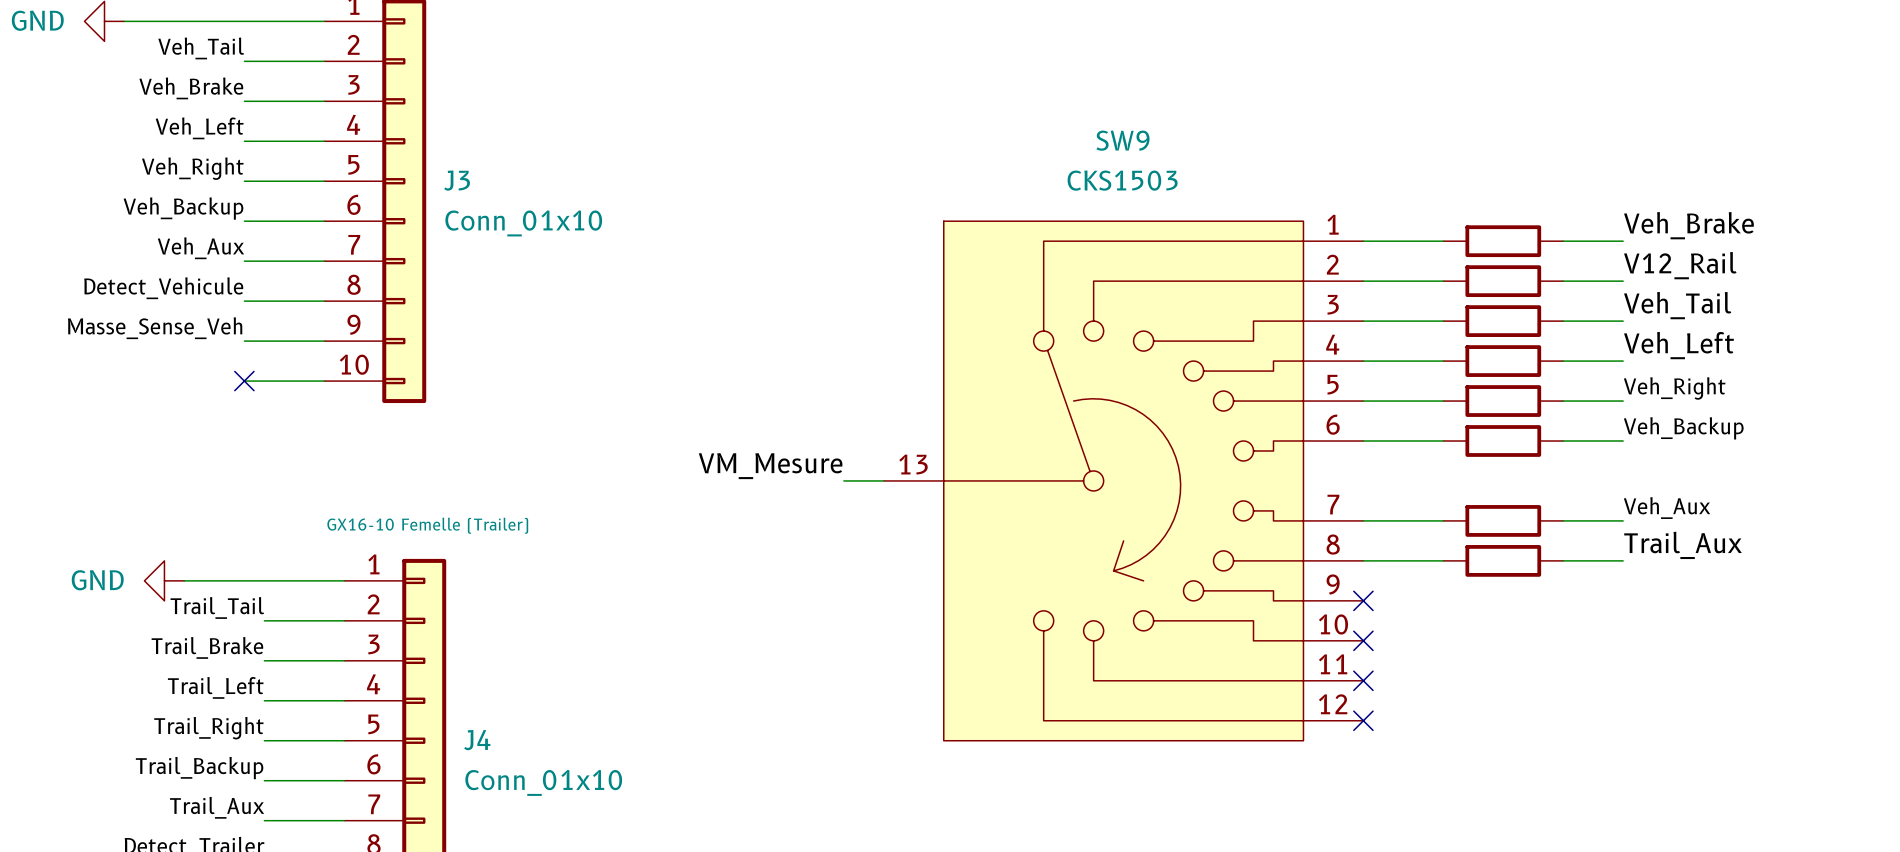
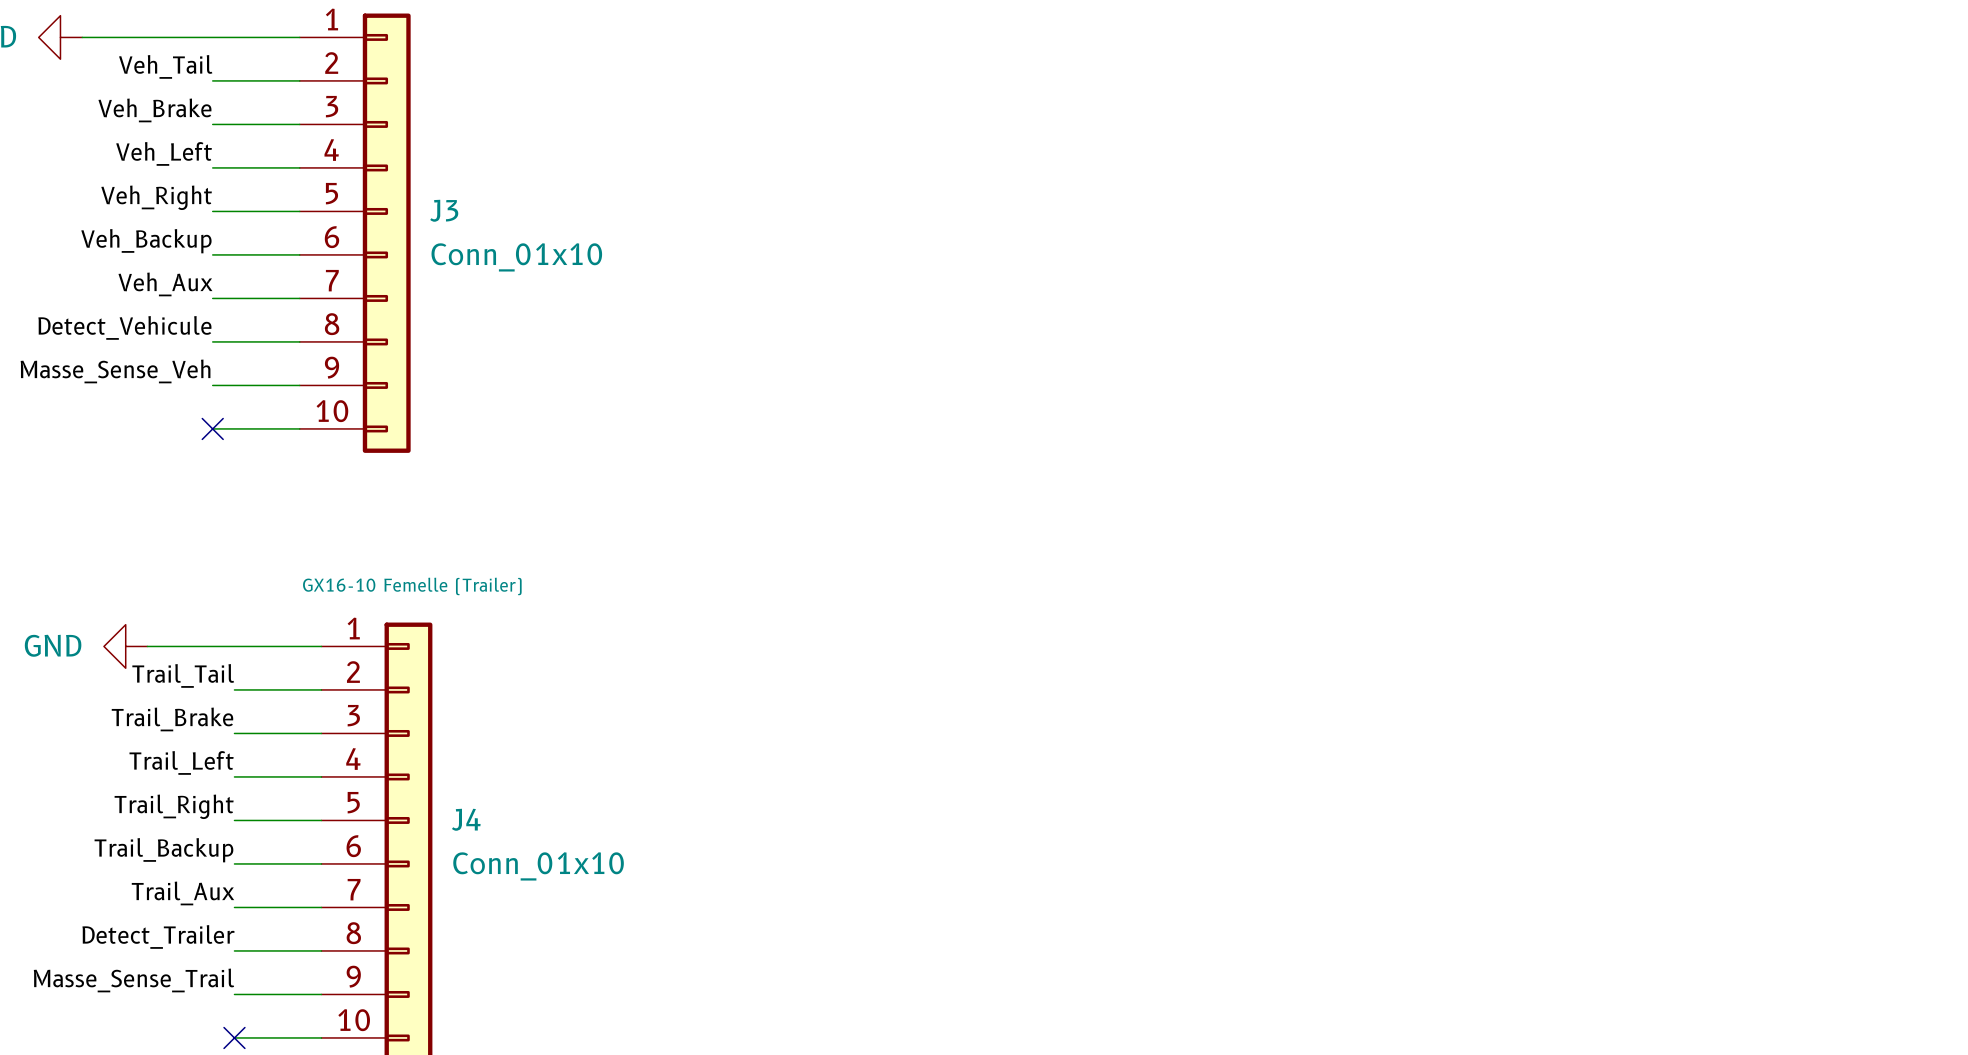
label: Veh_Brake (1688, 225) -> none
wire: (1363, 241) (1443, 241) -> none
part: (1503, 241) -> none
wire: (1563, 241) (1623, 241) -> none
label: V12_Rail (1680, 265) -> none
wire: (1363, 281) (1443, 281) -> none
part: (1503, 281) -> none
wire: (1563, 281) (1623, 281) -> none
label: Veh_Tail (1677, 305) -> none
wire: (1363, 321) (1443, 321) -> none
part: (1503, 321) -> none
wire: (1563, 321) (1623, 321) -> none
label: Veh_Left (1678, 345) -> none
wire: (1363, 361) (1443, 361) -> none
part: (1503, 361) -> none
wire: (1563, 361) (1623, 361) -> none
label: Veh_Right (1674, 388) -> none
wire: (1363, 401) (1443, 401) -> none
part: (1503, 401) -> none
wire: (1563, 401) (1623, 401) -> none
label: Veh_Backup (1683, 428) -> none
wire: (1363, 441) (1443, 441) -> none
part: (1503, 441) -> none
wire: (1563, 441) (1623, 441) -> none
label: VM_Mesure (770, 466) -> none
wire: (843, 480) (883, 480) -> none
SW9: CKS1503 (1123, 480) -> none
label: Veh_Aux (1667, 508) -> none
wire: (1363, 520) (1443, 520) -> none
part: (1503, 520) -> none
wire: (1563, 520) (1623, 520) -> none
label: Trail_Aux (1683, 545) -> none
wire: (1363, 560) (1443, 560) -> none
part: (1503, 560) -> none
wire: (1563, 560) (1623, 560) -> none
no-connect mark: (1363, 600) -> none
no-connect mark: (1363, 640) -> none
no-connect mark: (1363, 680) -> none
no-connect mark: (1363, 720) -> none

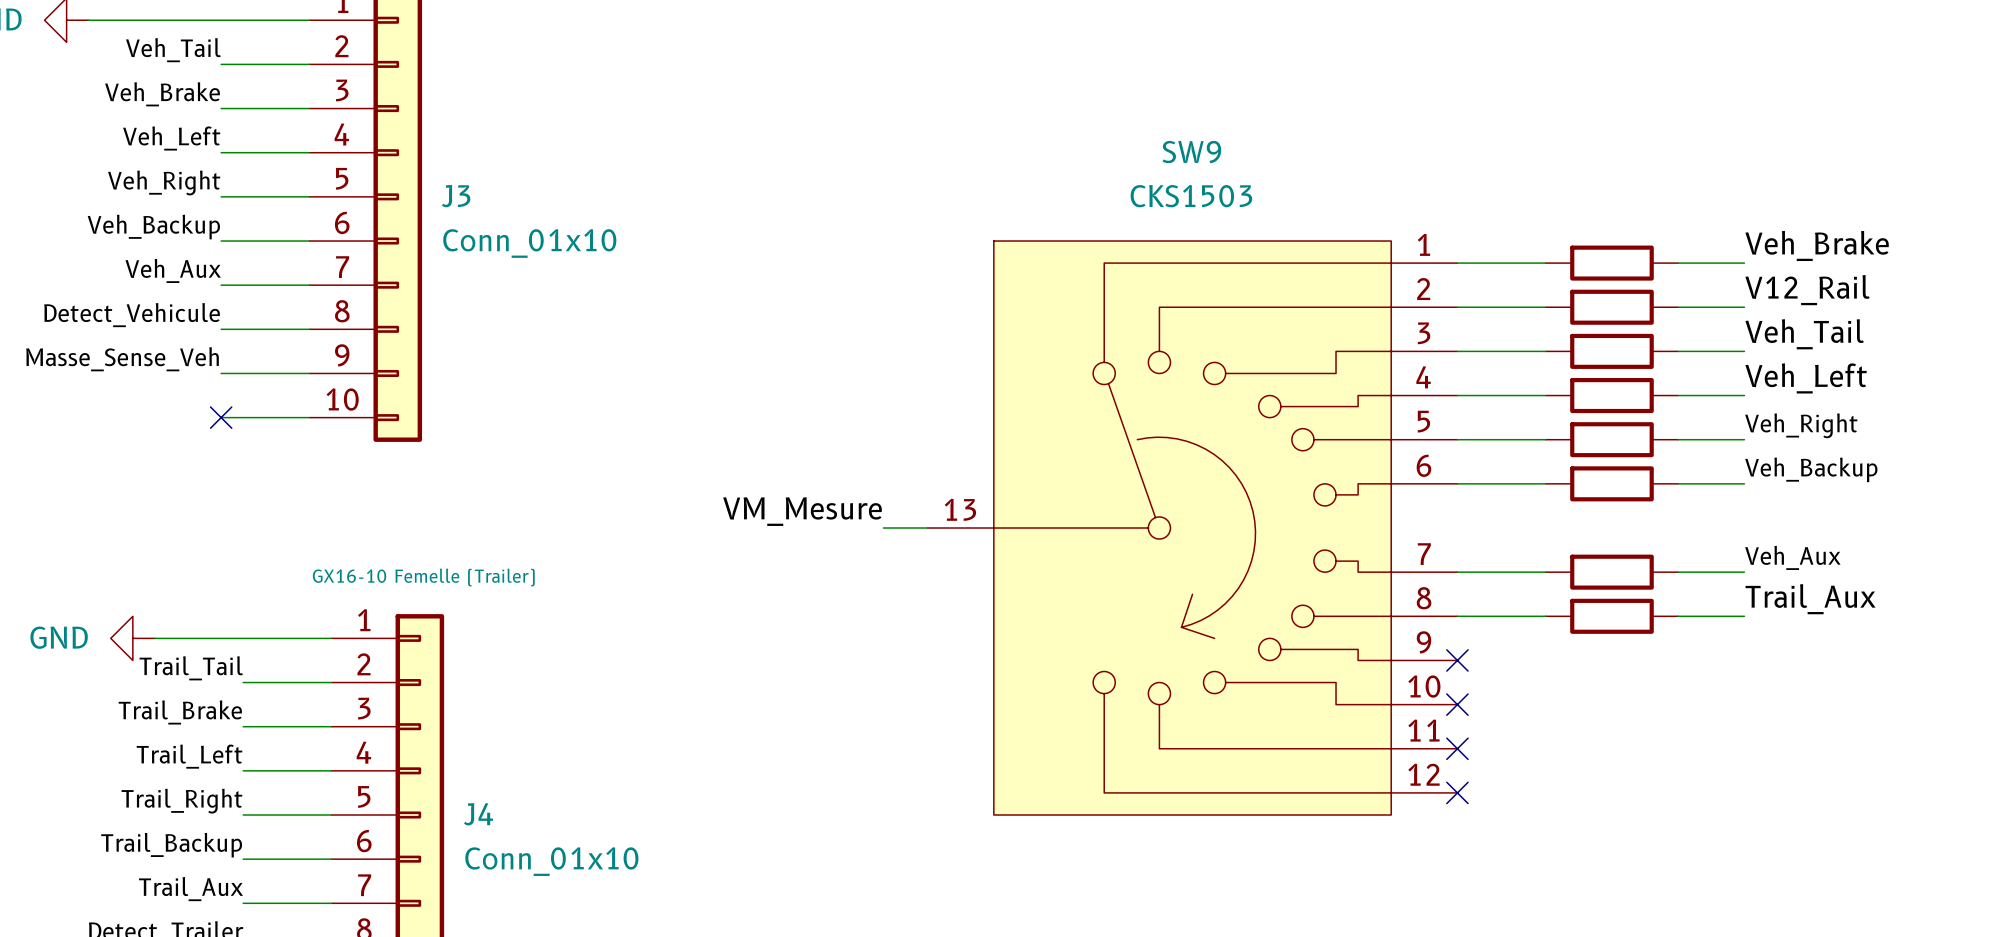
label: none -> Veh_Brake (1817, 245)
wire: none -> (1457, 263) (1545, 263)
part: none -> (1611, 263)
wire: none -> (1678, 263) (1744, 263)
label: none -> V12_Rail (1807, 290)
wire: none -> (1457, 307) (1545, 307)
part: none -> (1611, 307)
wire: none -> (1678, 307) (1744, 307)
label: none -> Veh_Tail (1804, 334)
wire: none -> (1457, 351) (1545, 351)
part: none -> (1611, 351)
wire: none -> (1678, 351) (1744, 351)
label: none -> Veh_Left (1806, 378)
wire: none -> (1457, 395) (1545, 395)
part: none -> (1611, 395)
wire: none -> (1678, 395) (1744, 395)
label: none -> Veh_Right (1801, 425)
wire: none -> (1457, 439) (1545, 439)
part: none -> (1611, 439)
wire: none -> (1678, 439) (1744, 439)
label: none -> Veh_Backup (1811, 469)
wire: none -> (1457, 483) (1545, 483)
part: none -> (1611, 483)
wire: none -> (1678, 483) (1744, 483)
label: none -> VM_Mesure (802, 511)
wire: none -> (883, 528) (927, 528)
SW9: none -> CKS1503 (1192, 528)
label: none -> Veh_Aux (1792, 557)
wire: none -> (1457, 572) (1545, 572)
part: none -> (1611, 572)
wire: none -> (1678, 572) (1744, 572)
label: none -> Trail_Aux (1810, 599)
wire: none -> (1457, 616) (1545, 616)
part: none -> (1611, 616)
wire: none -> (1678, 616) (1744, 616)
no-connect mark: none -> (1457, 660)
no-connect mark: none -> (1457, 704)
no-connect mark: none -> (1457, 748)
no-connect mark: none -> (1457, 792)

